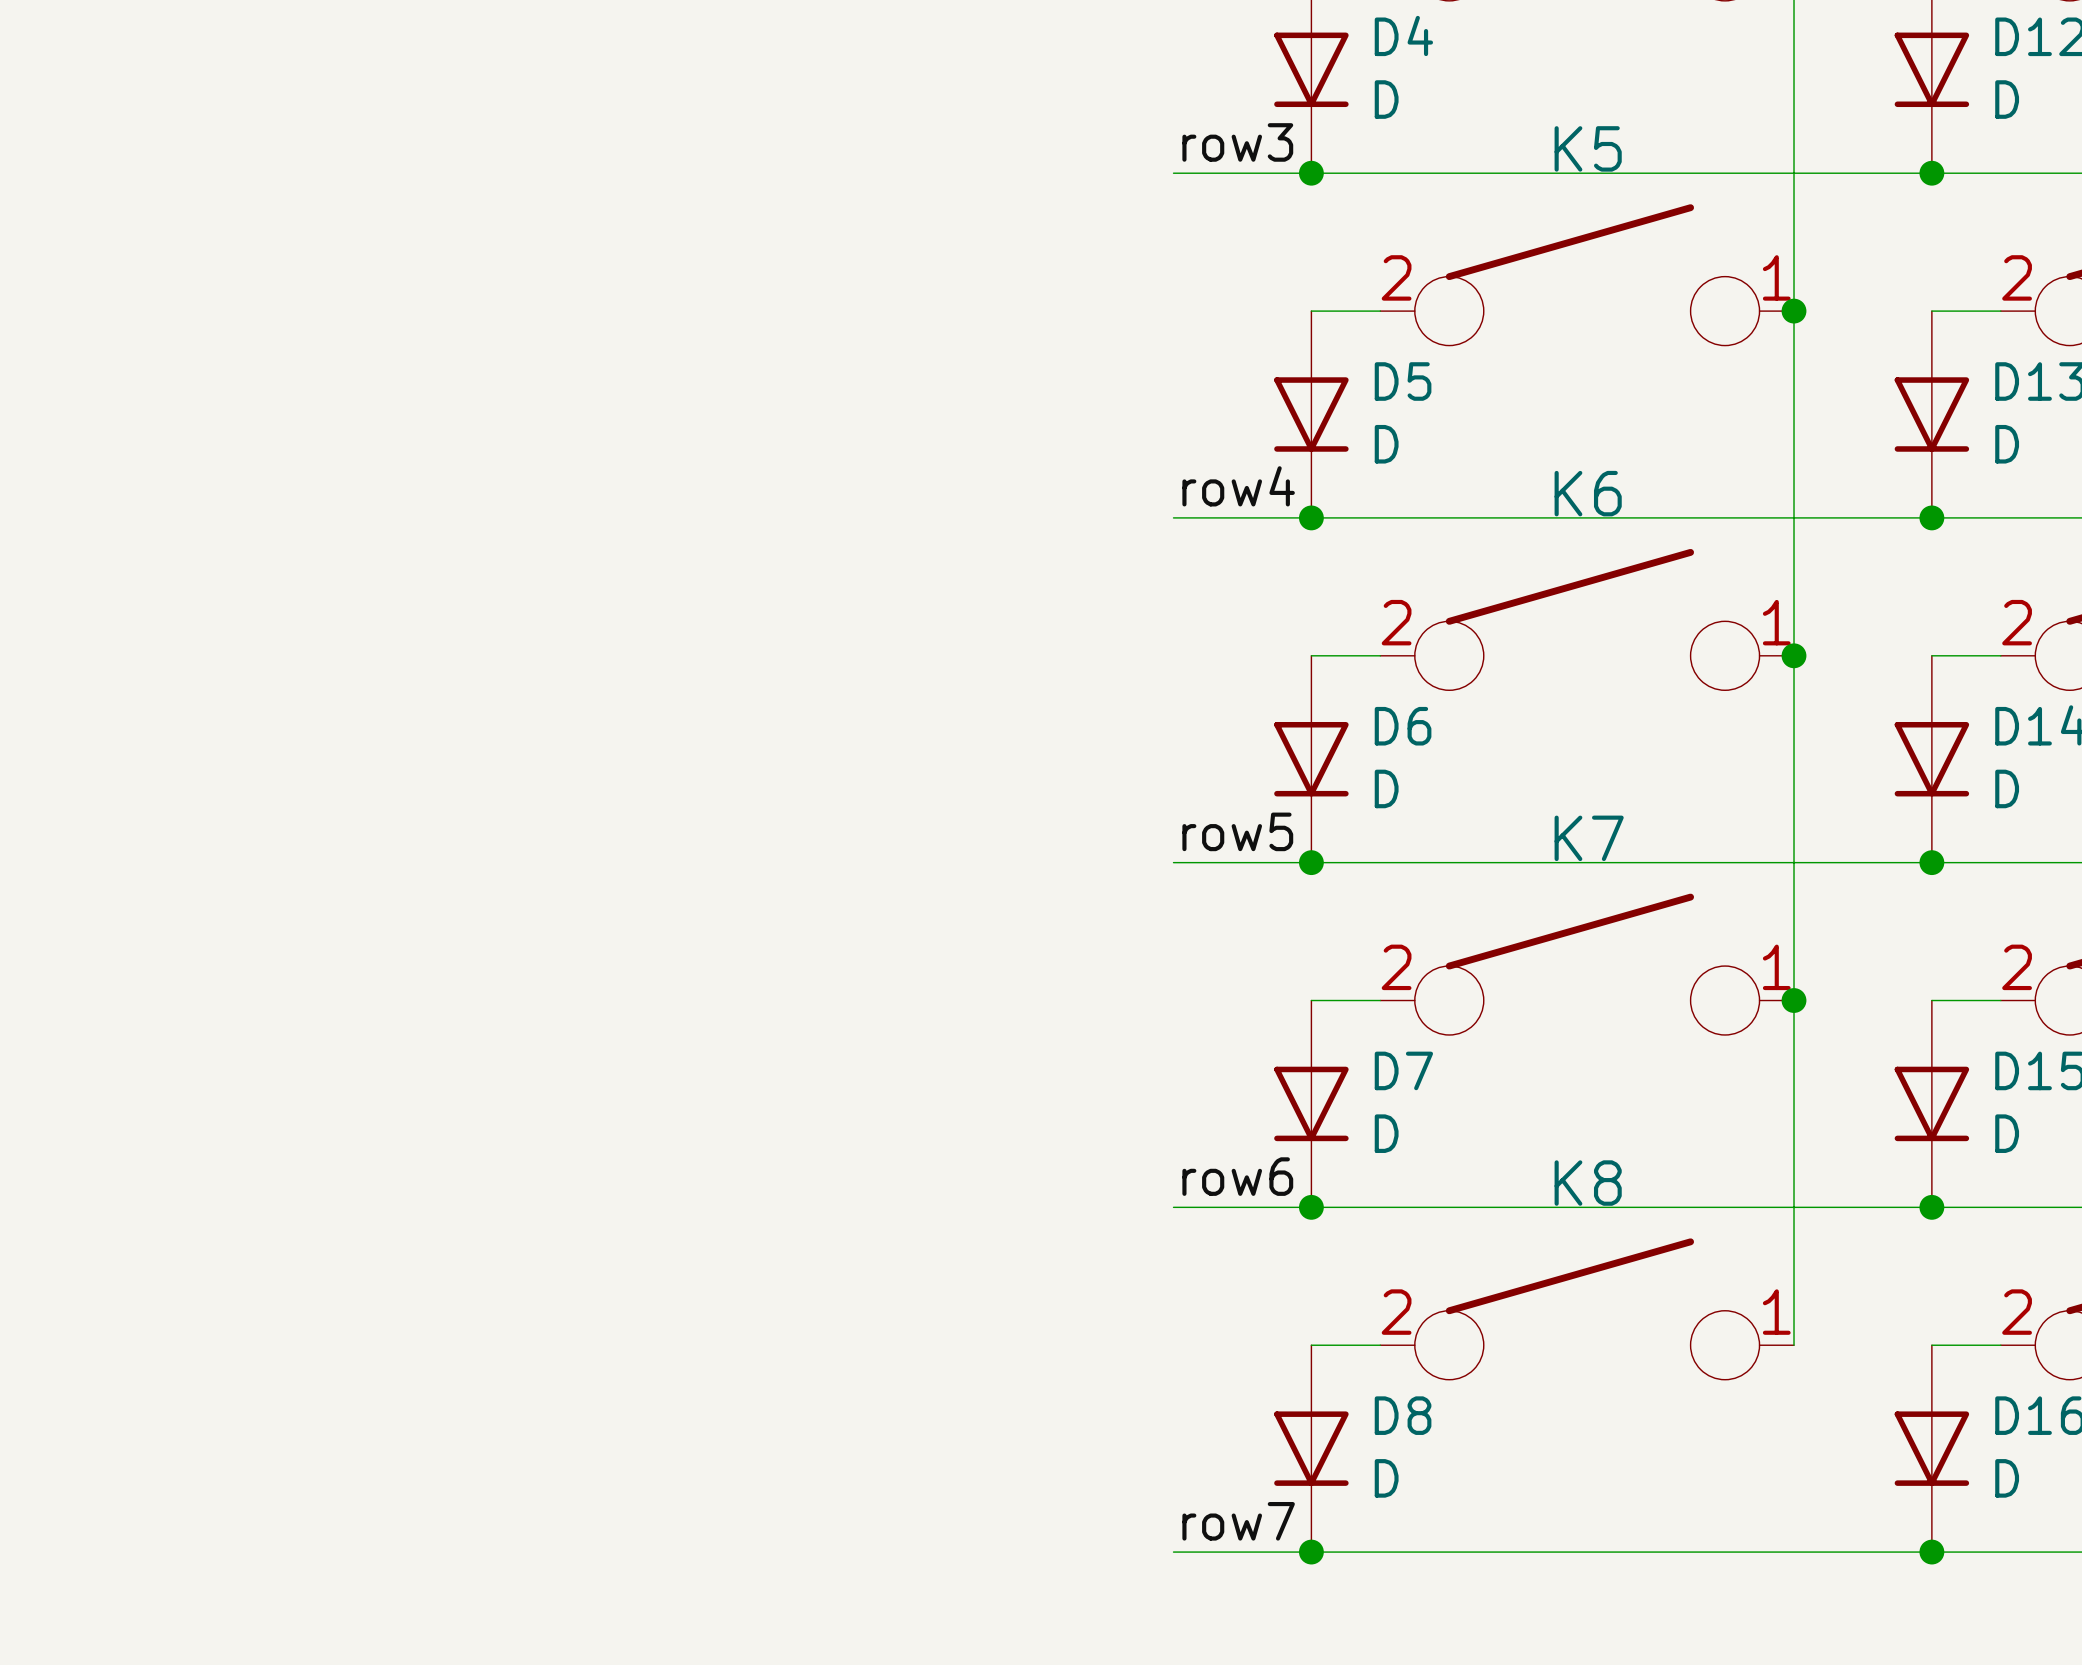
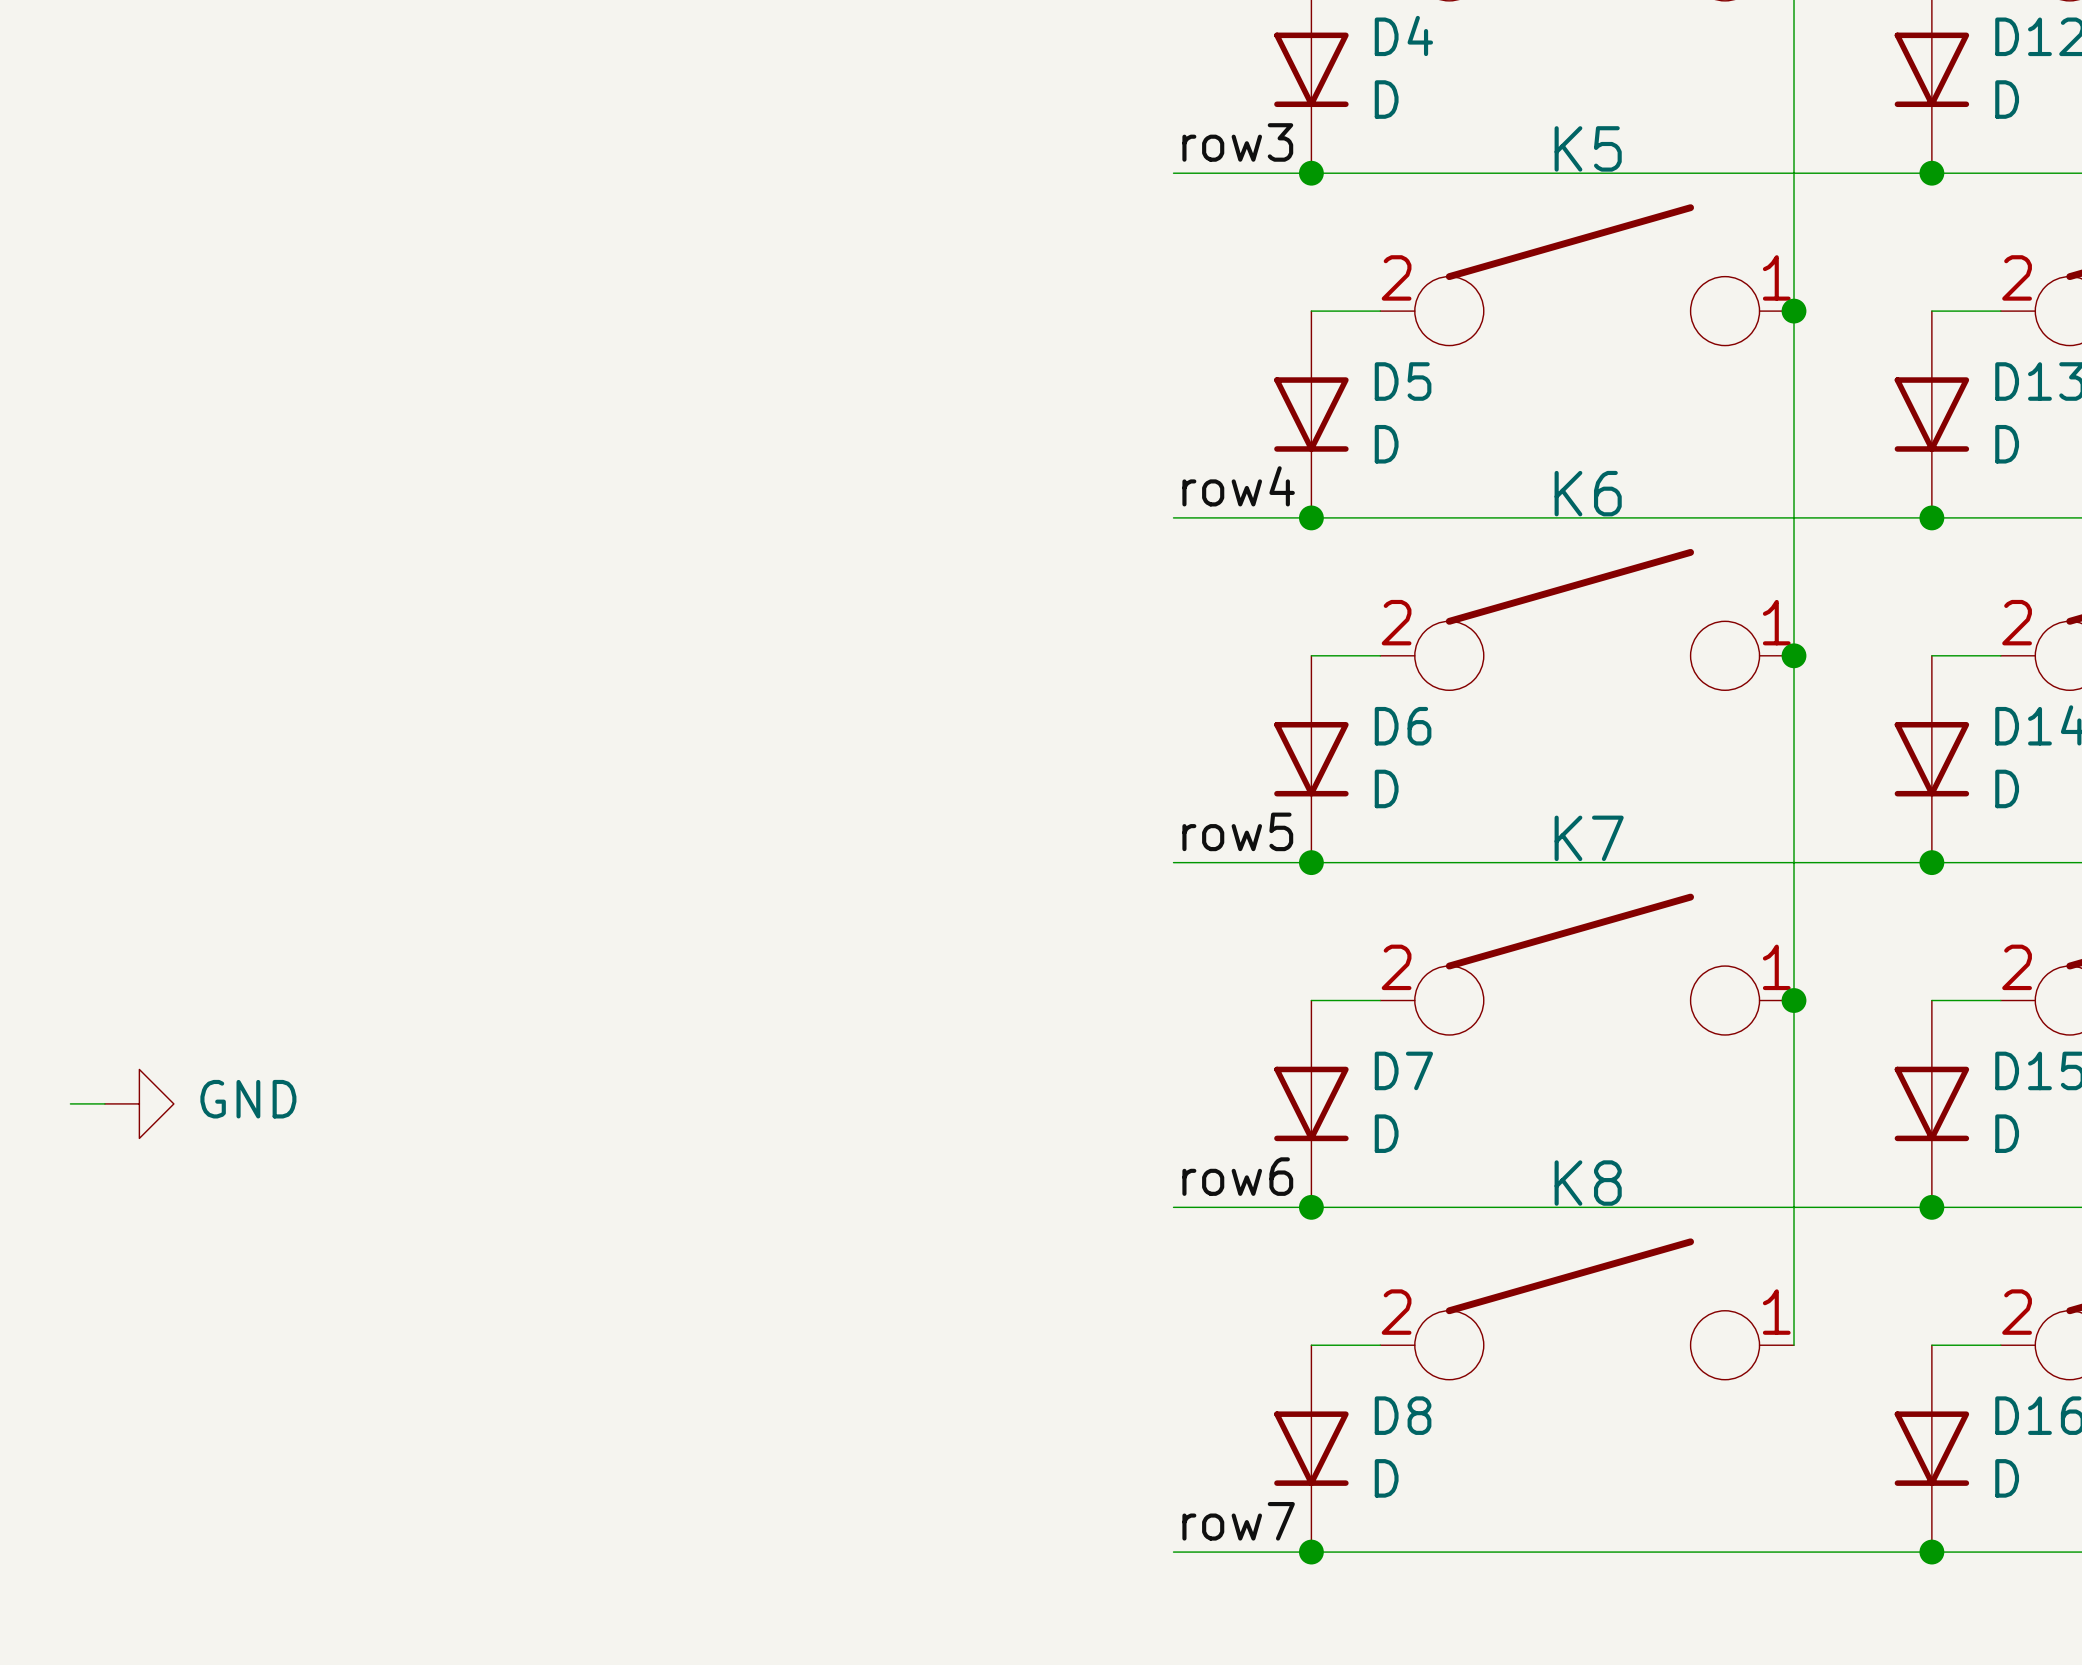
wire: none -> (70, 1103) (104, 1103)
power symbol: none -> GND (139, 1103)

